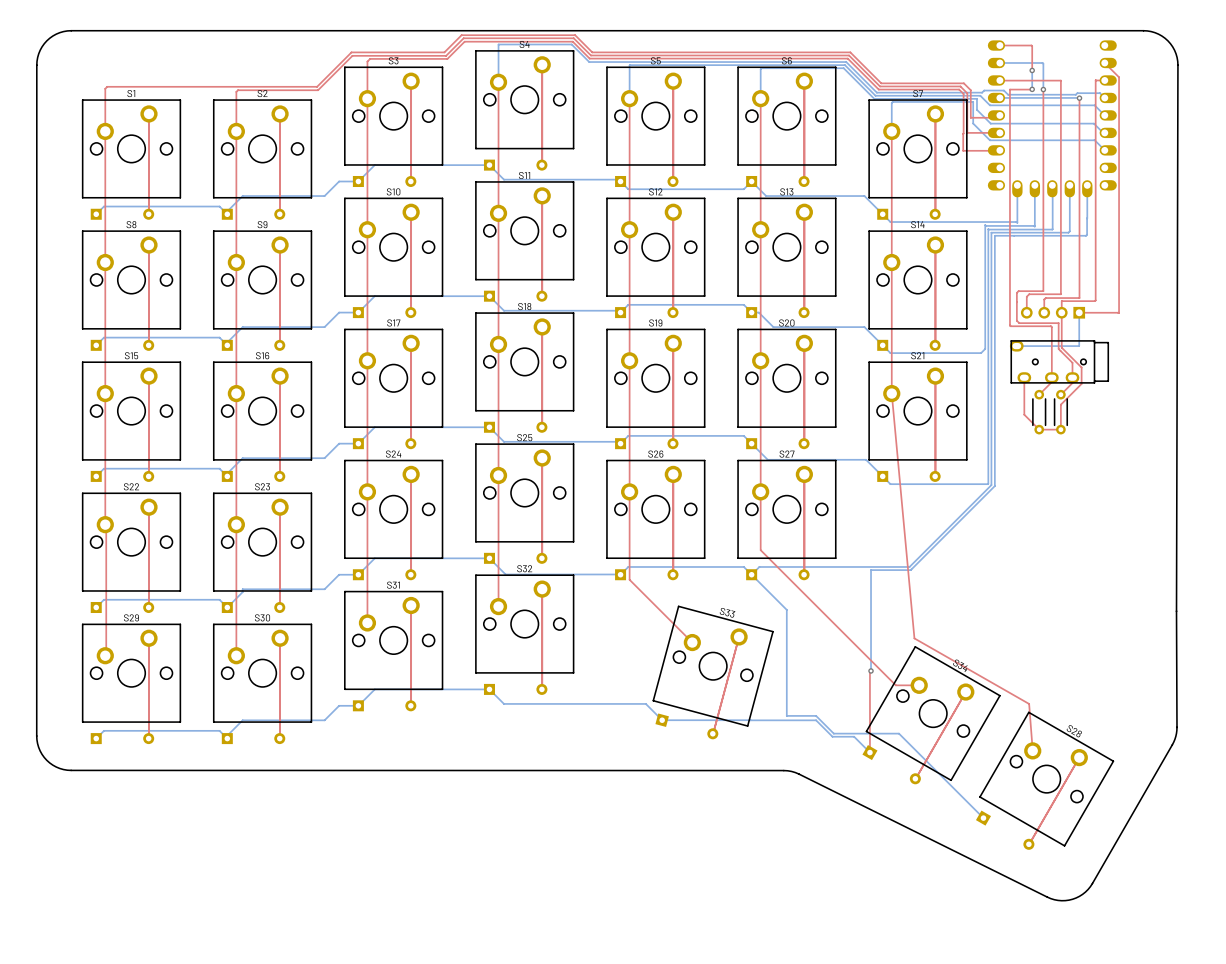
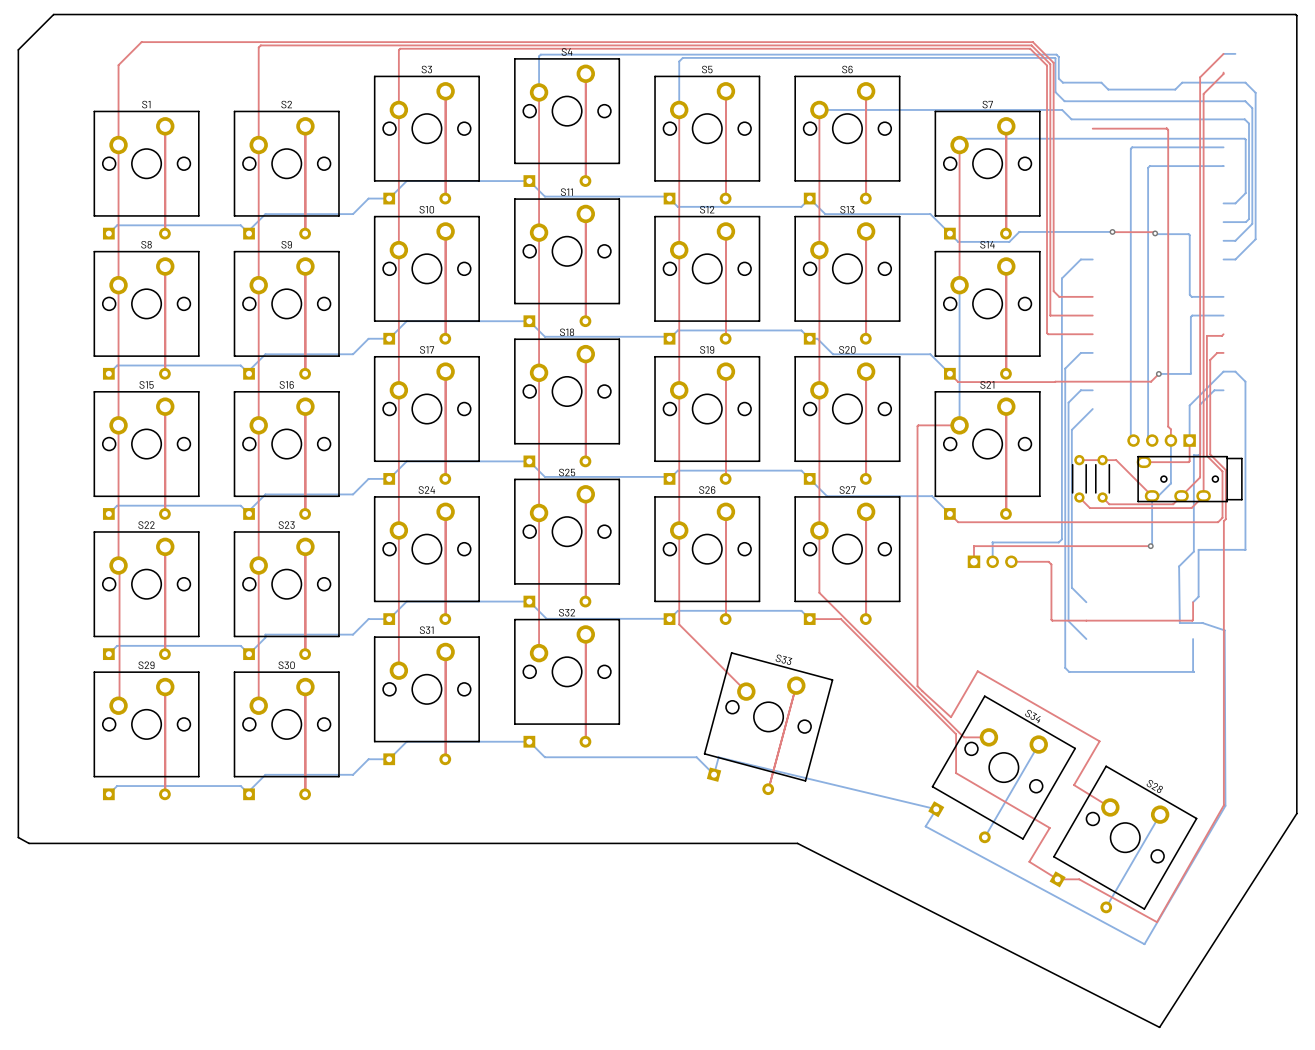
board edge: (71, 30) (1143, 30) (1154, 32) (1165, 38) (1174, 50) (1177, 65) (1176, 730) (1172, 744) (1088, 889) (1072, 899) (1061, 900) (1050, 898) (799, 774) (787, 770) (71, 770) (59, 768) (49, 762) (40, 750) (36, 736) (36, 65) (38, 53) (46, 40) (59, 32) (71, 30) -> (53, 14) (18, 49) (18, 837) (29, 843) (797, 843) (1159, 1027) (1296, 813) (1295, 14) (53, 14)
top track: (461, 35) (444, 52) (351, 52) (317, 86) (107, 86) (105, 88) -> (499, 42) (141, 42) (118, 65) (118, 99)
top track: (575, 35) (592, 52) (850, 52) (881, 83) (963, 83) (970, 90) (970, 117) (997, 117) (999, 115) -> (620, 42) (1032, 42) (1053, 62) (1053, 291) (1059, 296) (1092, 296)
top track: (463, 38) (446, 55) (352, 55) (318, 90) (237, 90) (236, 91) -> (501, 45) (260, 45) (258, 47) (258, 102)
top track: (573, 38) (590, 55) (849, 55) (880, 86) (960, 86) (967, 92) (967, 132) (999, 132) -> (619, 45) (1031, 45) (1050, 64) (1050, 315)
top track: (999, 45) (1031, 45) (1032, 70) -> none
bottom track: none -> (1223, 53) (1235, 53)
top track: none -> (1223, 53) (1200, 77) (1200, 477) (1173, 504) (1109, 504) (1102, 497)
bottom track: (498, 48) (498, 44) (571, 44) (589, 62) (846, 62) (876, 92) (982, 92) (984, 90) (1003, 90) (1008, 94) (1099, 93) (1104, 97) -> (539, 56) (540, 54) (1056, 54) (1058, 56) (1058, 78) (1062, 82) (1101, 82) (1108, 89) (1175, 89) (1182, 82) (1245, 82) (1255, 92) (1255, 239) (1235, 259) (1223, 259)
top track: (367, 61) (370, 58) (447, 58) (464, 41) (572, 41) (589, 58) (847, 58) (878, 89) (959, 89) (963, 93) (963, 150) (999, 150) -> (398, 70) (400, 48) (1030, 48) (1047, 65) (1047, 333) (1092, 334)
bottom track: (999, 62) (1042, 62) (1043, 89) -> none
top track: (1104, 62) (1119, 77) (1119, 312) (1079, 312) -> none
top track: none -> (1223, 72) (1203, 93) (1203, 496) (1191, 508) (1089, 508) (1079, 497)
bottom track: (629, 65) (844, 65) (875, 95) (980, 95) (989, 105) (1094, 105) (1104, 115) -> (679, 74) (679, 61) (682, 57) (1055, 57) (1055, 92) (1064, 101) (1245, 101) (1252, 108) (1252, 223) (1235, 240) (1223, 240)
bottom track: (1032, 70) (1032, 89) -> none
via: (1032, 70) -> none
top track: (999, 80) (1060, 80) (1060, 294) (1029, 294) (1026, 296) (1026, 312) -> none
top track: (1104, 80) (1095, 80) (1095, 300) (1061, 301) (1061, 347) (1081, 367) (1081, 383) (1060, 404) (1060, 429) (1039, 429) (1024, 414) (1024, 377) -> none
top track: (1032, 89) (1009, 89) (1009, 325) (1051, 327) (1051, 382) (1039, 394) -> none
via: (1032, 89) -> none
top track: (1043, 89) (1043, 291) (1018, 291) (1016, 292) (1016, 320) (1019, 323) (1058, 323) (1058, 348) (1072, 362) (1072, 383) (1060, 394) -> none
via: (1043, 89) -> none
bottom track: (999, 97) (1079, 98) -> none
bottom track: (760, 98) (761, 68) (843, 68) (874, 98) (976, 98) (976, 109) (990, 123) (1093, 123) (1104, 132) -> (819, 109) (1062, 109) (1071, 119) (1244, 119) (1249, 123) (1249, 219) (1245, 222) (1223, 222)
top track: (1079, 98) (1079, 298) (1045, 298) (1044, 312) -> none
via: (1079, 98) -> none
top track: none -> (1092, 128) (1168, 129) (1168, 426) (1170, 429) (1170, 440)
part: (1052, 118) -> none
bottom track: (891, 131) (892, 101) (973, 101) (973, 123) (989, 140) (1094, 140) (1104, 150) -> (959, 145) (965, 138) (1244, 138) (1245, 193) (1235, 203) (1223, 203)
bottom track: none -> (1223, 147) (1130, 148) (1130, 437) (1133, 440)
bottom track: none -> (1223, 166) (1149, 166) (1148, 167) (1148, 436) (1152, 440)
bottom track: (1017, 185) (1017, 222) (938, 222) -> (1112, 231) (1019, 231) (1009, 241)
bottom track: (1034, 185) (1034, 226) -> none
bottom track: (1052, 185) (1052, 229) (988, 229) (988, 483) (890, 484) (882, 476) -> none
bottom track: (1069, 185) (1068, 232) (991, 232) (991, 485) (909, 566) (759, 566) (751, 574) (786, 609) (786, 715) (816, 715) (833, 733) (899, 733) (983, 818) -> none
bottom track: (1087, 185) (1086, 235) (994, 236) (994, 486) (910, 570) (871, 570) (871, 670) -> none
top track: none -> (1112, 231) (1155, 233)
via: none -> (1112, 231)
bottom track: none -> (1155, 233) (1188, 234) (1189, 294) (1191, 296) (1223, 296)
via: none -> (1155, 233)
bottom track: (1034, 226) (985, 225) (985, 348) (981, 353) (890, 353) (882, 345) -> none
bottom track: none -> (1092, 259) (1080, 259) (1061, 278) (1061, 539) (1058, 542) (992, 542) (992, 561)
bottom track: none -> (959, 285) (959, 425)
top track: (891, 262) (891, 393) (914, 638) (1029, 703) (1032, 750) -> (959, 425) (917, 426) (917, 686) (950, 717) (977, 671) (1099, 741) (1074, 785) (1110, 807)
top track: none -> (1050, 315) (1092, 315)
bottom track: none -> (1223, 315) (1190, 316) (1190, 373) (1158, 373)
top track: none -> (1223, 334) (1206, 335) (1206, 455) (1222, 471) (1222, 517) (1218, 522) (958, 522) (949, 513)
part position: (1053, 312) -> (1161, 440)
bottom track: (1079, 312) (1078, 346) (1016, 346) -> none
bottom track: none -> (1092, 352) (1080, 352) (1065, 368) (1065, 667) (1069, 671) (1194, 671) (1193, 639)
top track: none -> (1223, 352) (1217, 352) (1210, 359) (1210, 454) (1225, 470) (1225, 519) (1223, 521) (1223, 805) (1157, 922) (1079, 879) (1057, 879) (1029, 861) (1049, 827) (956, 773) (956, 734) (840, 619) (809, 619)
top track: none -> (949, 373) (958, 382) (1151, 381) (1158, 373)
via: none -> (1158, 373)
bottom track: none -> (1092, 390) (1080, 390) (1068, 402) (1068, 621) (1086, 639)
part position: (1059, 361) -> (1189, 479)
bottom track: none -> (1092, 409) (1071, 429) (1071, 587) (1086, 602)
bottom track: none -> (1170, 440) (1170, 483) (1158, 496) (1152, 496) (1150, 546)
bottom track: none -> (1189, 440) (1189, 405) (1223, 371) (1235, 371) (1245, 381) (1245, 549)
top track: none -> (1189, 440) (1188, 462) (1144, 462)
part: (1039, 412) -> none
part: (1060, 412) -> none
top track: none -> (1079, 460) (1116, 460) (1152, 496)
part: none -> (1079, 478)
part: none -> (1102, 478)
top track: none -> (1150, 546) (974, 546) (973, 561)
via: none -> (1150, 546)
bottom track: none -> (1245, 549) (1198, 549) (1198, 596) (1193, 602)
part: none -> (992, 561)
top track: none -> (1011, 561) (1048, 561) (1051, 564) (1052, 620) (1192, 620) (1193, 602)
top track: (871, 670) (869, 752) -> none
via: (871, 670) -> none
bottom track: none -> (1038, 744) (984, 837)
top track: (965, 692) (915, 778) -> none
bottom track: (662, 720) (816, 720) (832, 736) (854, 736) (869, 752) -> (714, 774) (718, 757) (936, 809) (925, 826) (1144, 944) (1225, 805) (1224, 630) (1202, 623) (1179, 623) (1179, 566) (1193, 551) (1193, 455) (1200, 453) (1200, 404) (1214, 390) (1223, 390)
bottom track: none -> (1160, 814) (1106, 907)
top track: (1079, 757) (1029, 844) -> none

